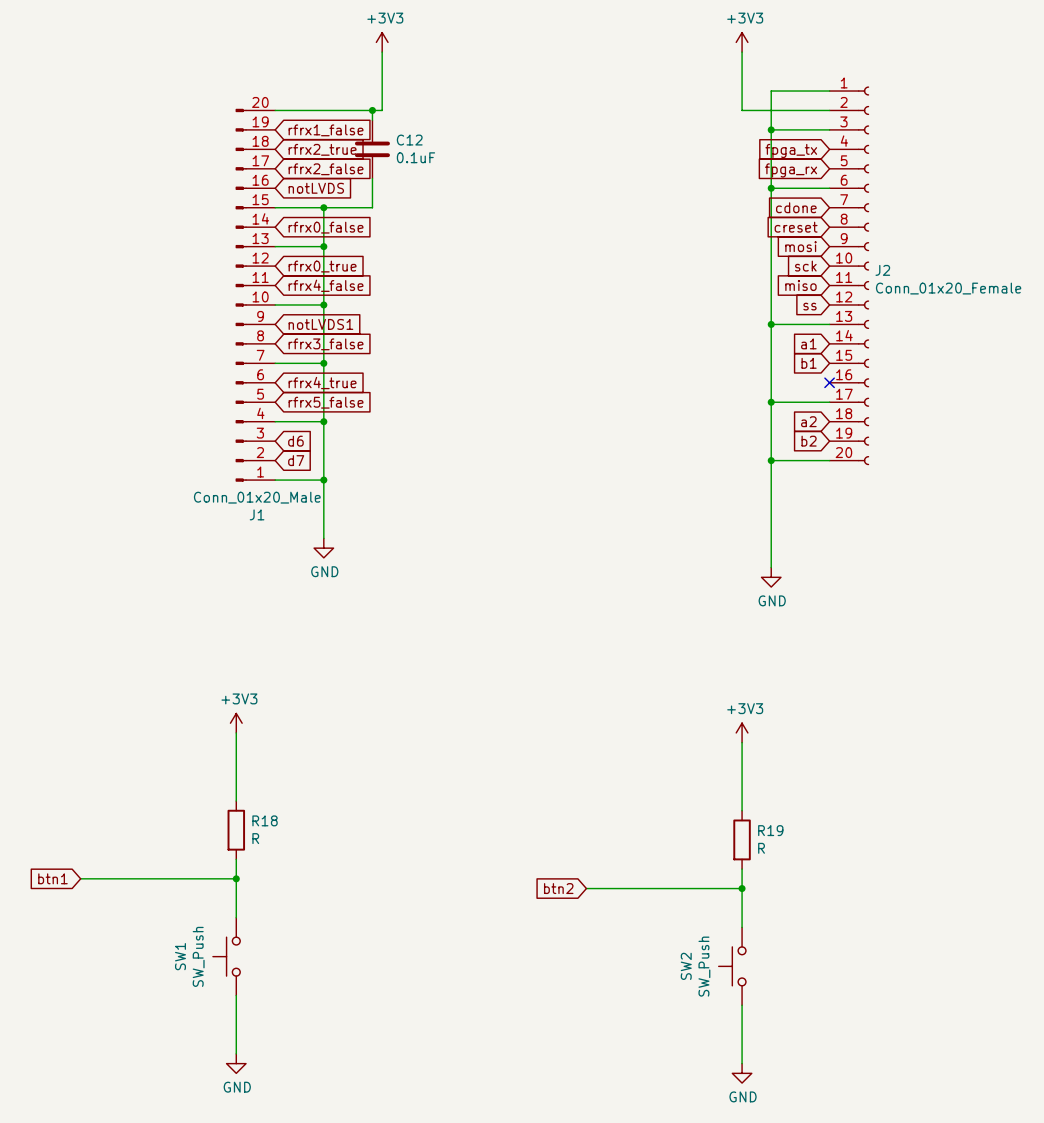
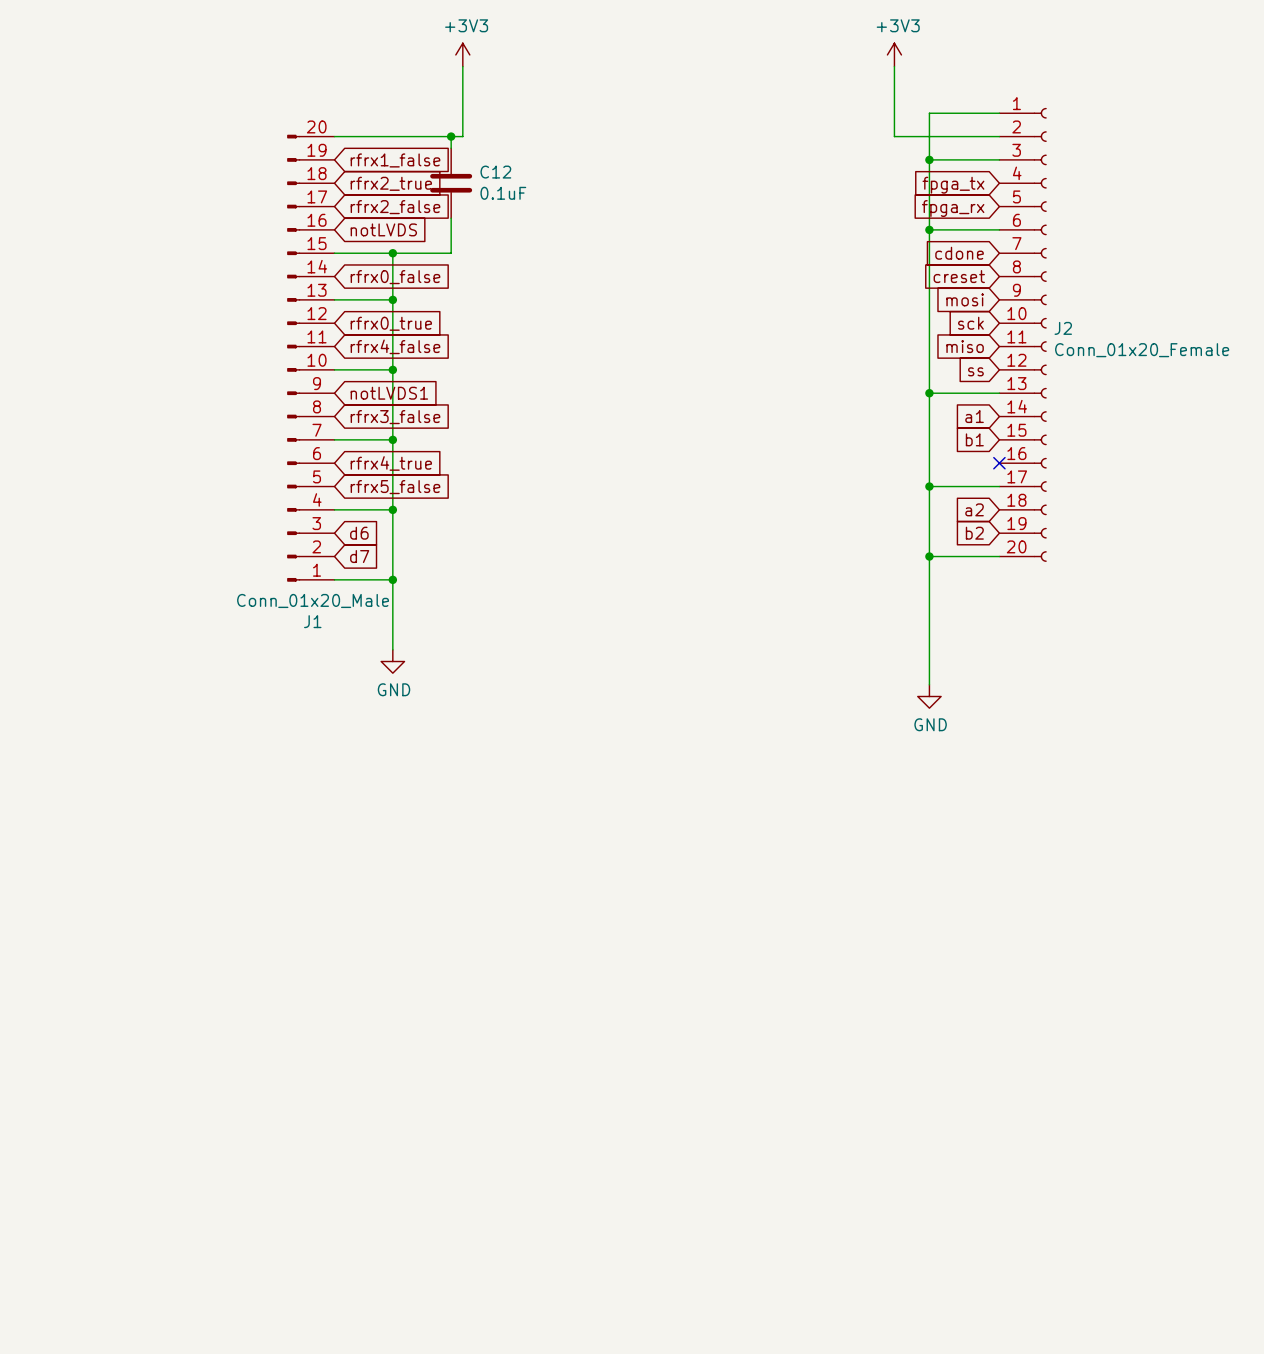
power symbol: +3V3 (236, 723) -> none
wire: (236, 732) (236, 801) -> none
power symbol: +3V3 (742, 732) -> none
wire: (742, 742) (742, 810) -> none
R18: R (236, 830) -> none
R19: R (742, 839) -> none
wire: (236, 859) (236, 917) -> none
wire: (742, 869) (742, 927) -> none
global label: btn1 (52, 878) -> none
wire: (80, 878) (236, 878) -> none
junction: (236, 878) -> none
global label: btn2 (558, 888) -> none
wire: (586, 888) (742, 888) -> none
junction: (742, 888) -> none
SW1: SW_Push (226, 956) -> none
SW2: SW_Push (732, 966) -> none
wire: (236, 995) (236, 1053) -> none
wire: (742, 1005) (742, 1063) -> none
power symbol: GND (236, 1063) -> none
power symbol: GND (742, 1073) -> none

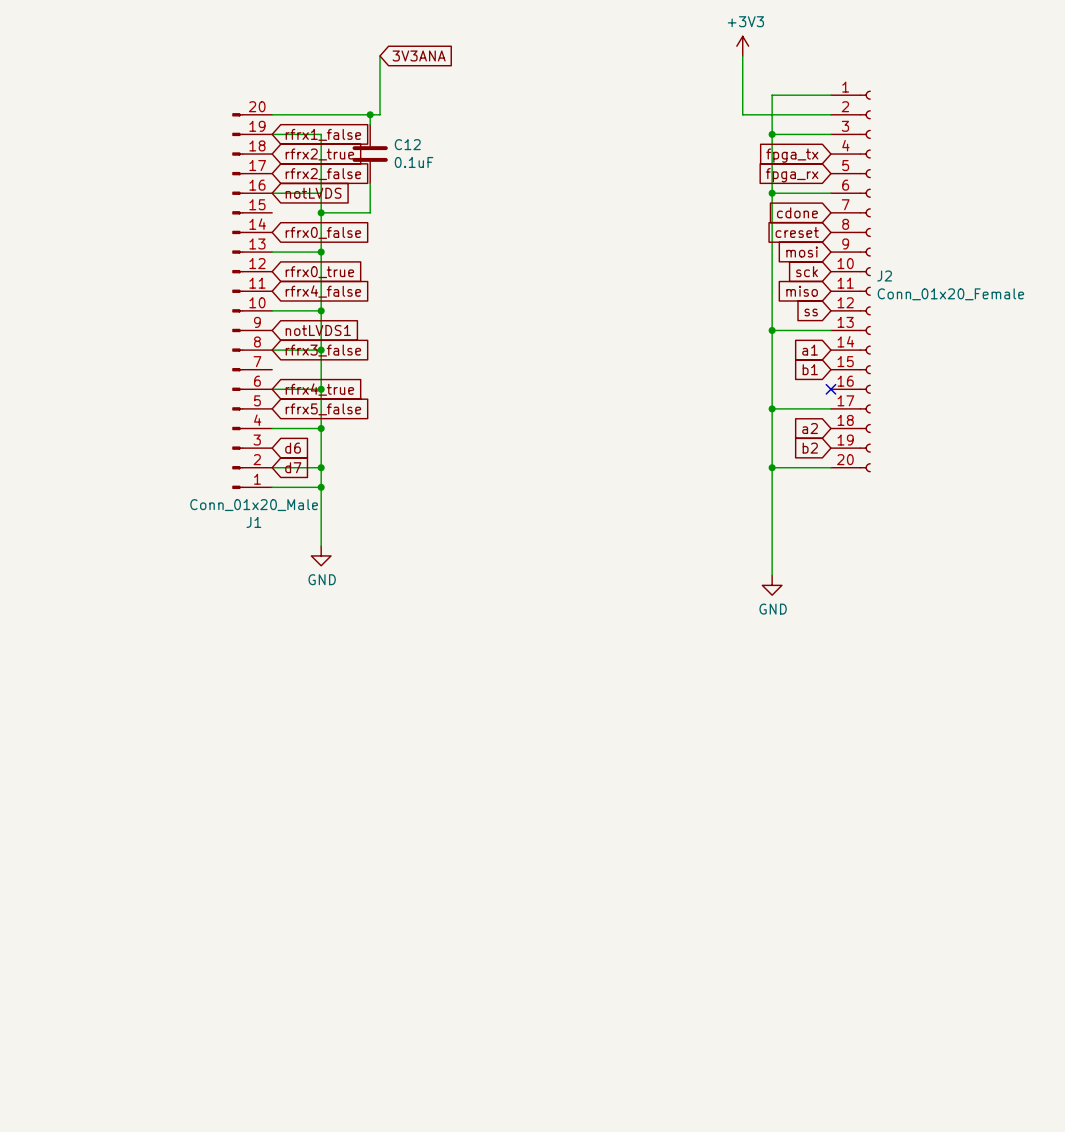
power symbol: +3V3 (462, 54) -> none
global label: none -> 3V3ANA (419, 55)
wire: none -> (272, 193) (321, 193)
wire: (334, 253) (392, 253) -> (272, 134) (321, 134) (321, 212)
junction: none -> (321, 350)
wire: (334, 439) (392, 439) -> (272, 350) (321, 350)
junction: (392, 439) -> none
wire: none -> (272, 389) (321, 389)
junction: none -> (321, 389)
wire: none -> (272, 467) (321, 467)
junction: none -> (321, 467)

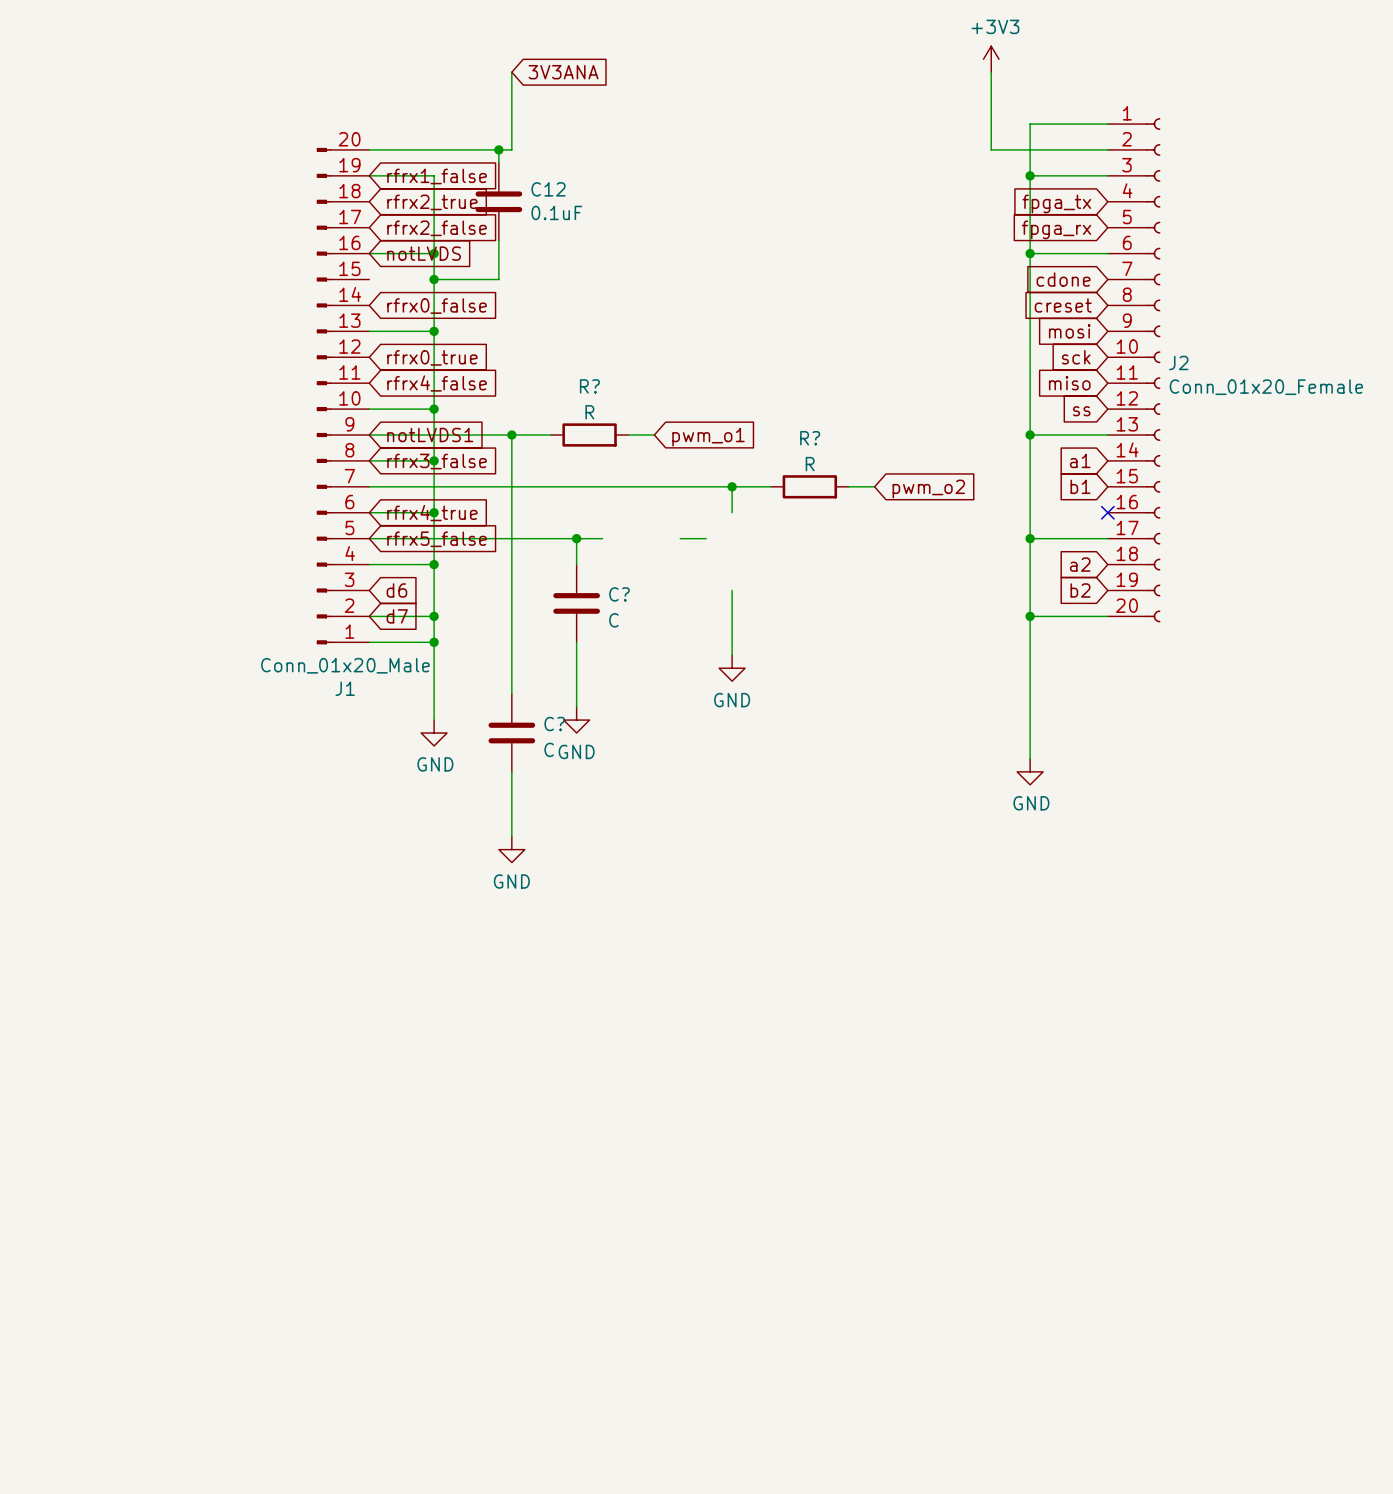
junction: none -> (434, 253)
wire: none -> (369, 435) (550, 435)
wire: none -> (511, 435) (511, 694)
junction: none -> (511, 435)
R?: none -> R (589, 435)
wire: none -> (628, 435) (654, 435)
global label: none -> pwm_o1 (708, 437)
wire: none -> (369, 486) (770, 486)
wire: none -> (732, 486) (732, 512)
junction: none -> (732, 486)
R?: none -> R (809, 486)
wire: none -> (848, 486) (874, 486)
global label: none -> pwm_o2 (928, 488)
wire: none -> (369, 538) (602, 538)
wire: none -> (576, 538) (576, 564)
junction: none -> (576, 538)
wire: none -> (680, 538) (706, 538)
wire: none -> (732, 590) (732, 655)
C?: none -> C (576, 603)
wire: none -> (576, 642) (576, 707)
power symbol: none -> GND (732, 668)
power symbol: none -> GND (576, 720)
C?: none -> C (511, 733)
wire: none -> (511, 771) (511, 836)
power symbol: none -> GND (511, 849)

